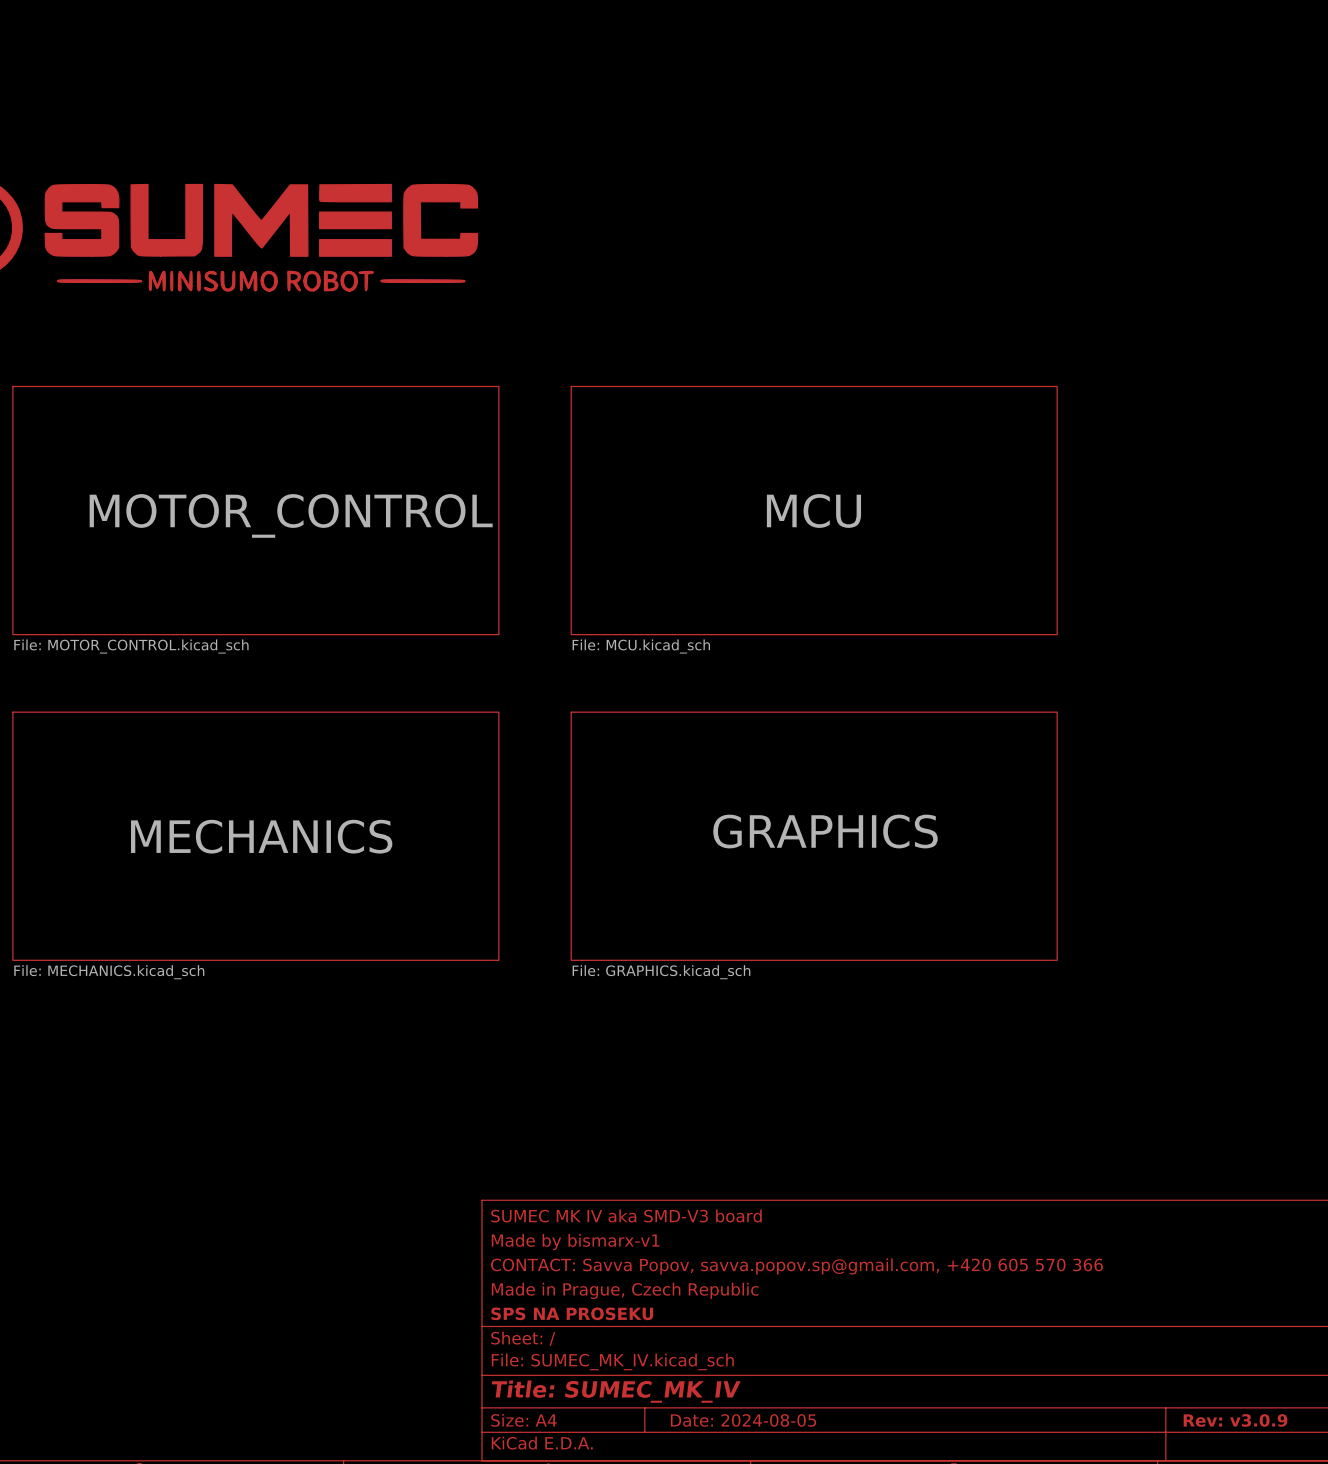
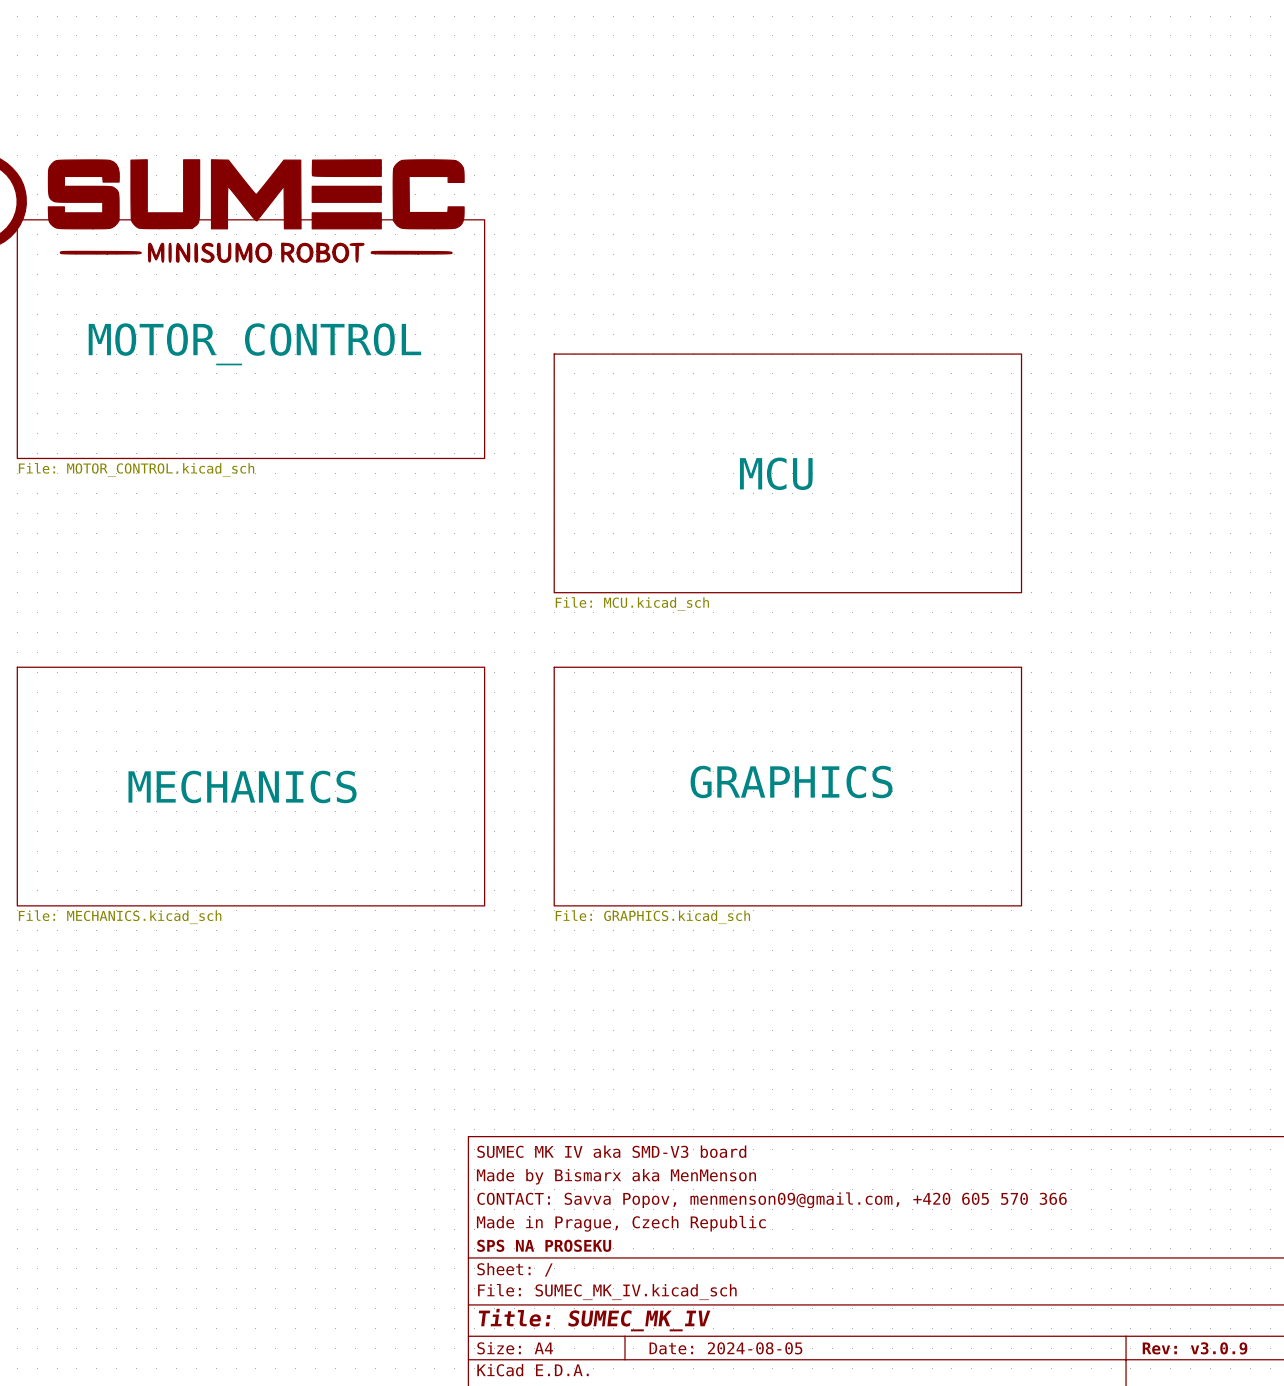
sheet MOTOR_CONTROL position: (255, 510) -> (250, 339)
title block: Made by bismarx-v1 (575, 1242) -> Made by Bismarx aka MenMenson (616, 1176)
title block: CONTACT: Savva Popov, savva.popov.sp@gmail.com, +420 605 570 366 (796, 1266) -> CONTACT: Savva Popov, menmenson09@gmail.com, +420 605 570 366 (772, 1200)

